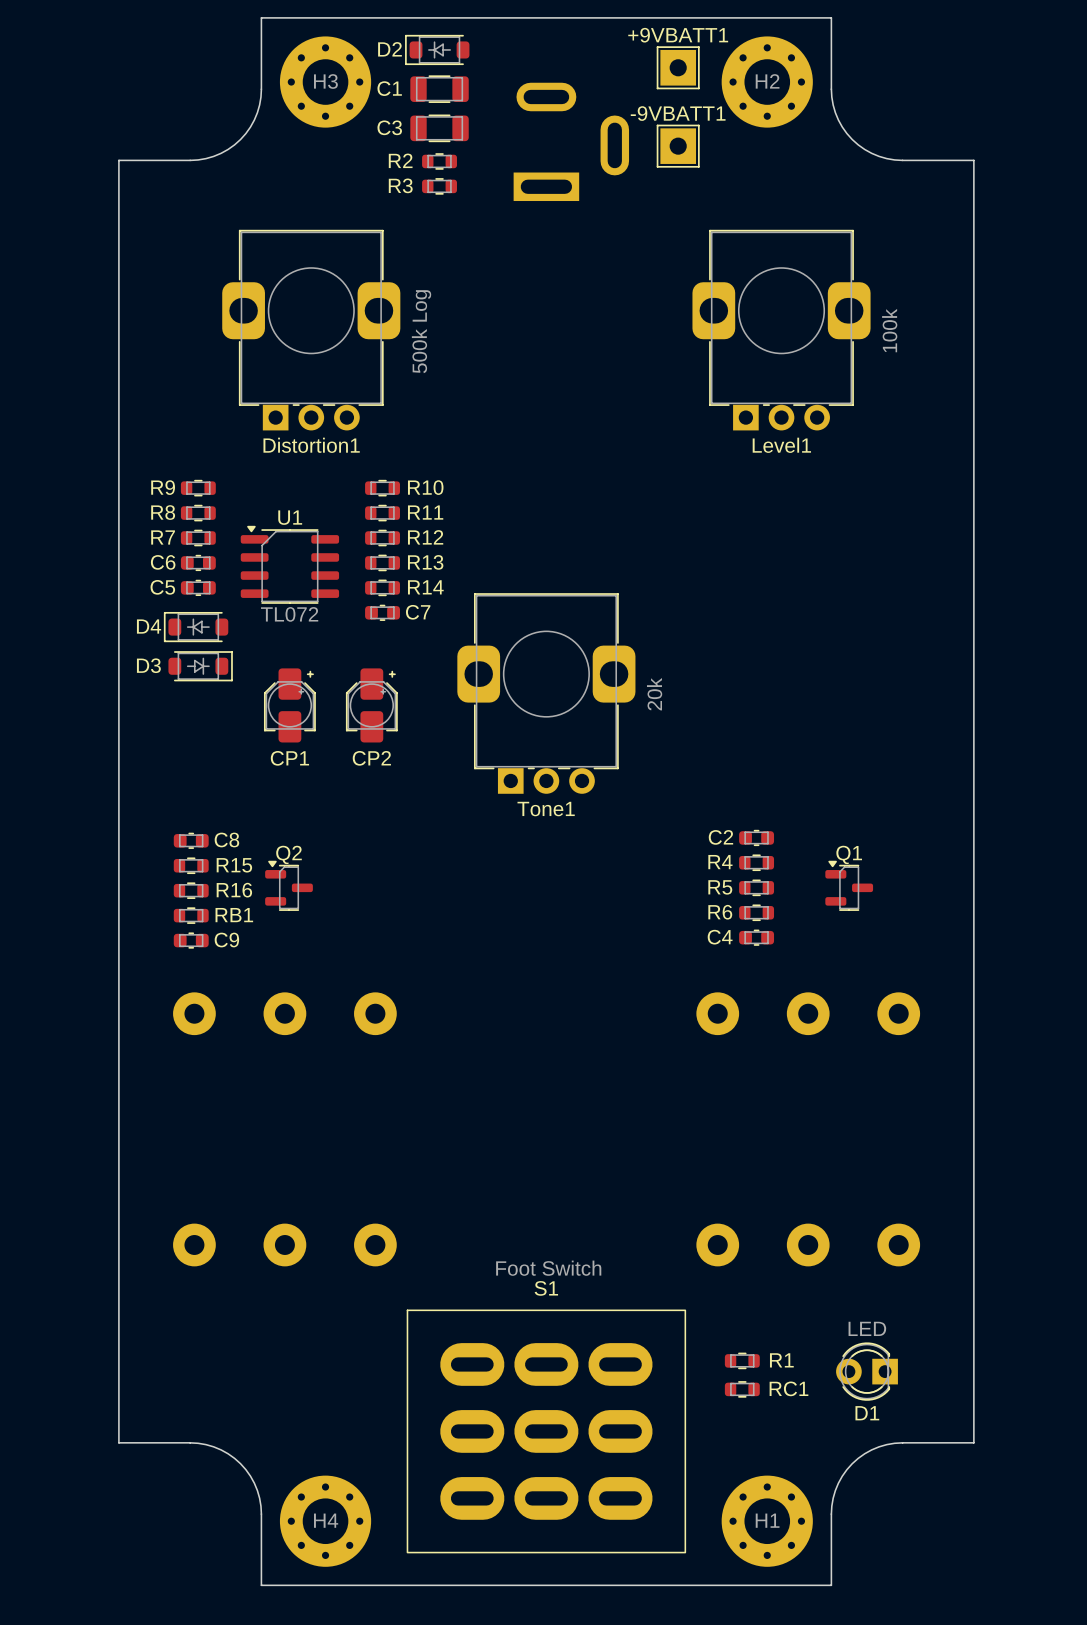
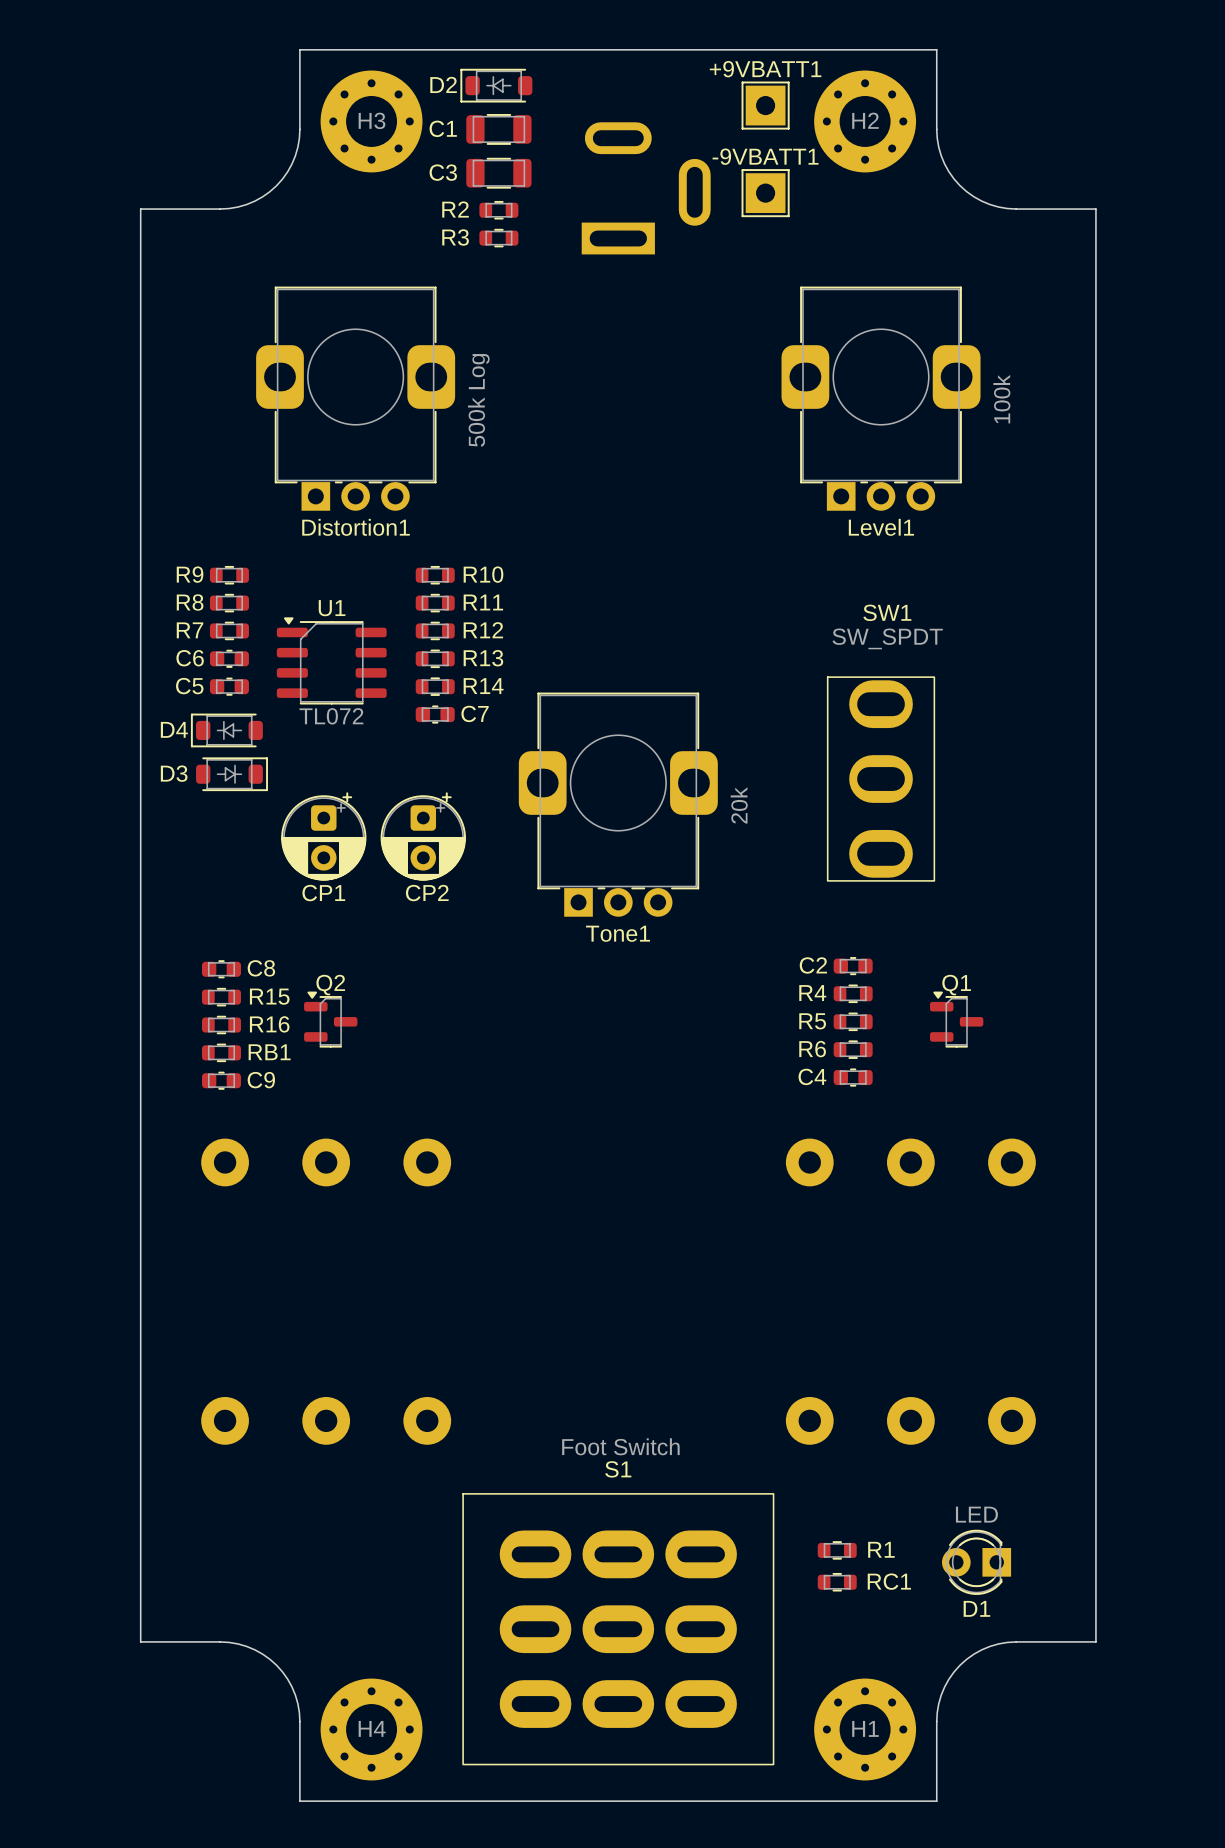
CP1 footprint: [263, 668, 316, 743] -> [281, 792, 367, 881]
CP2 footprint: [345, 668, 398, 743] -> [380, 792, 466, 881]
SW1: none -> SW_SPDT (881, 779)

